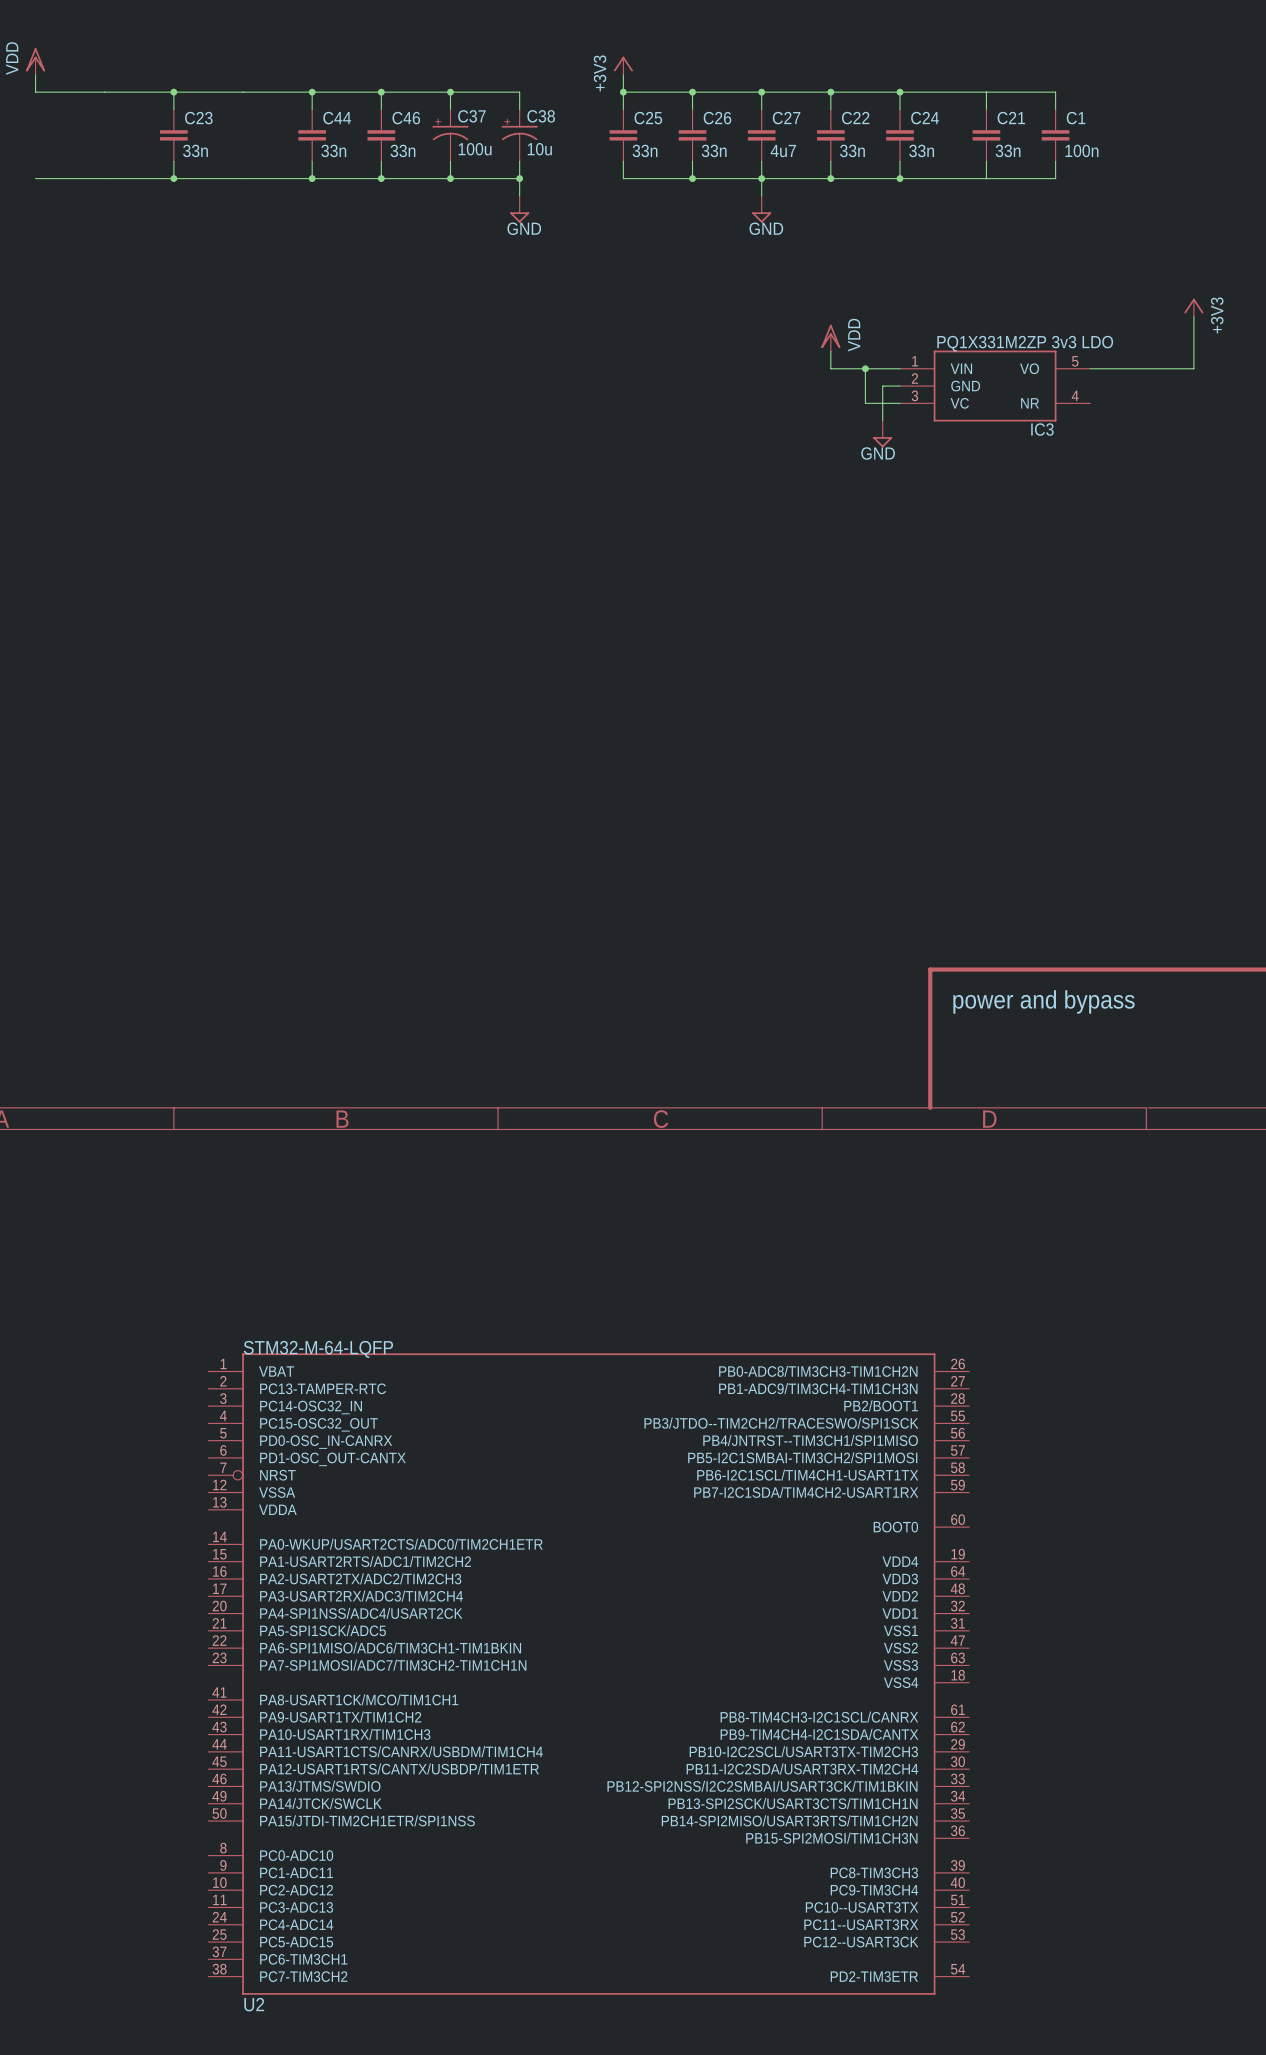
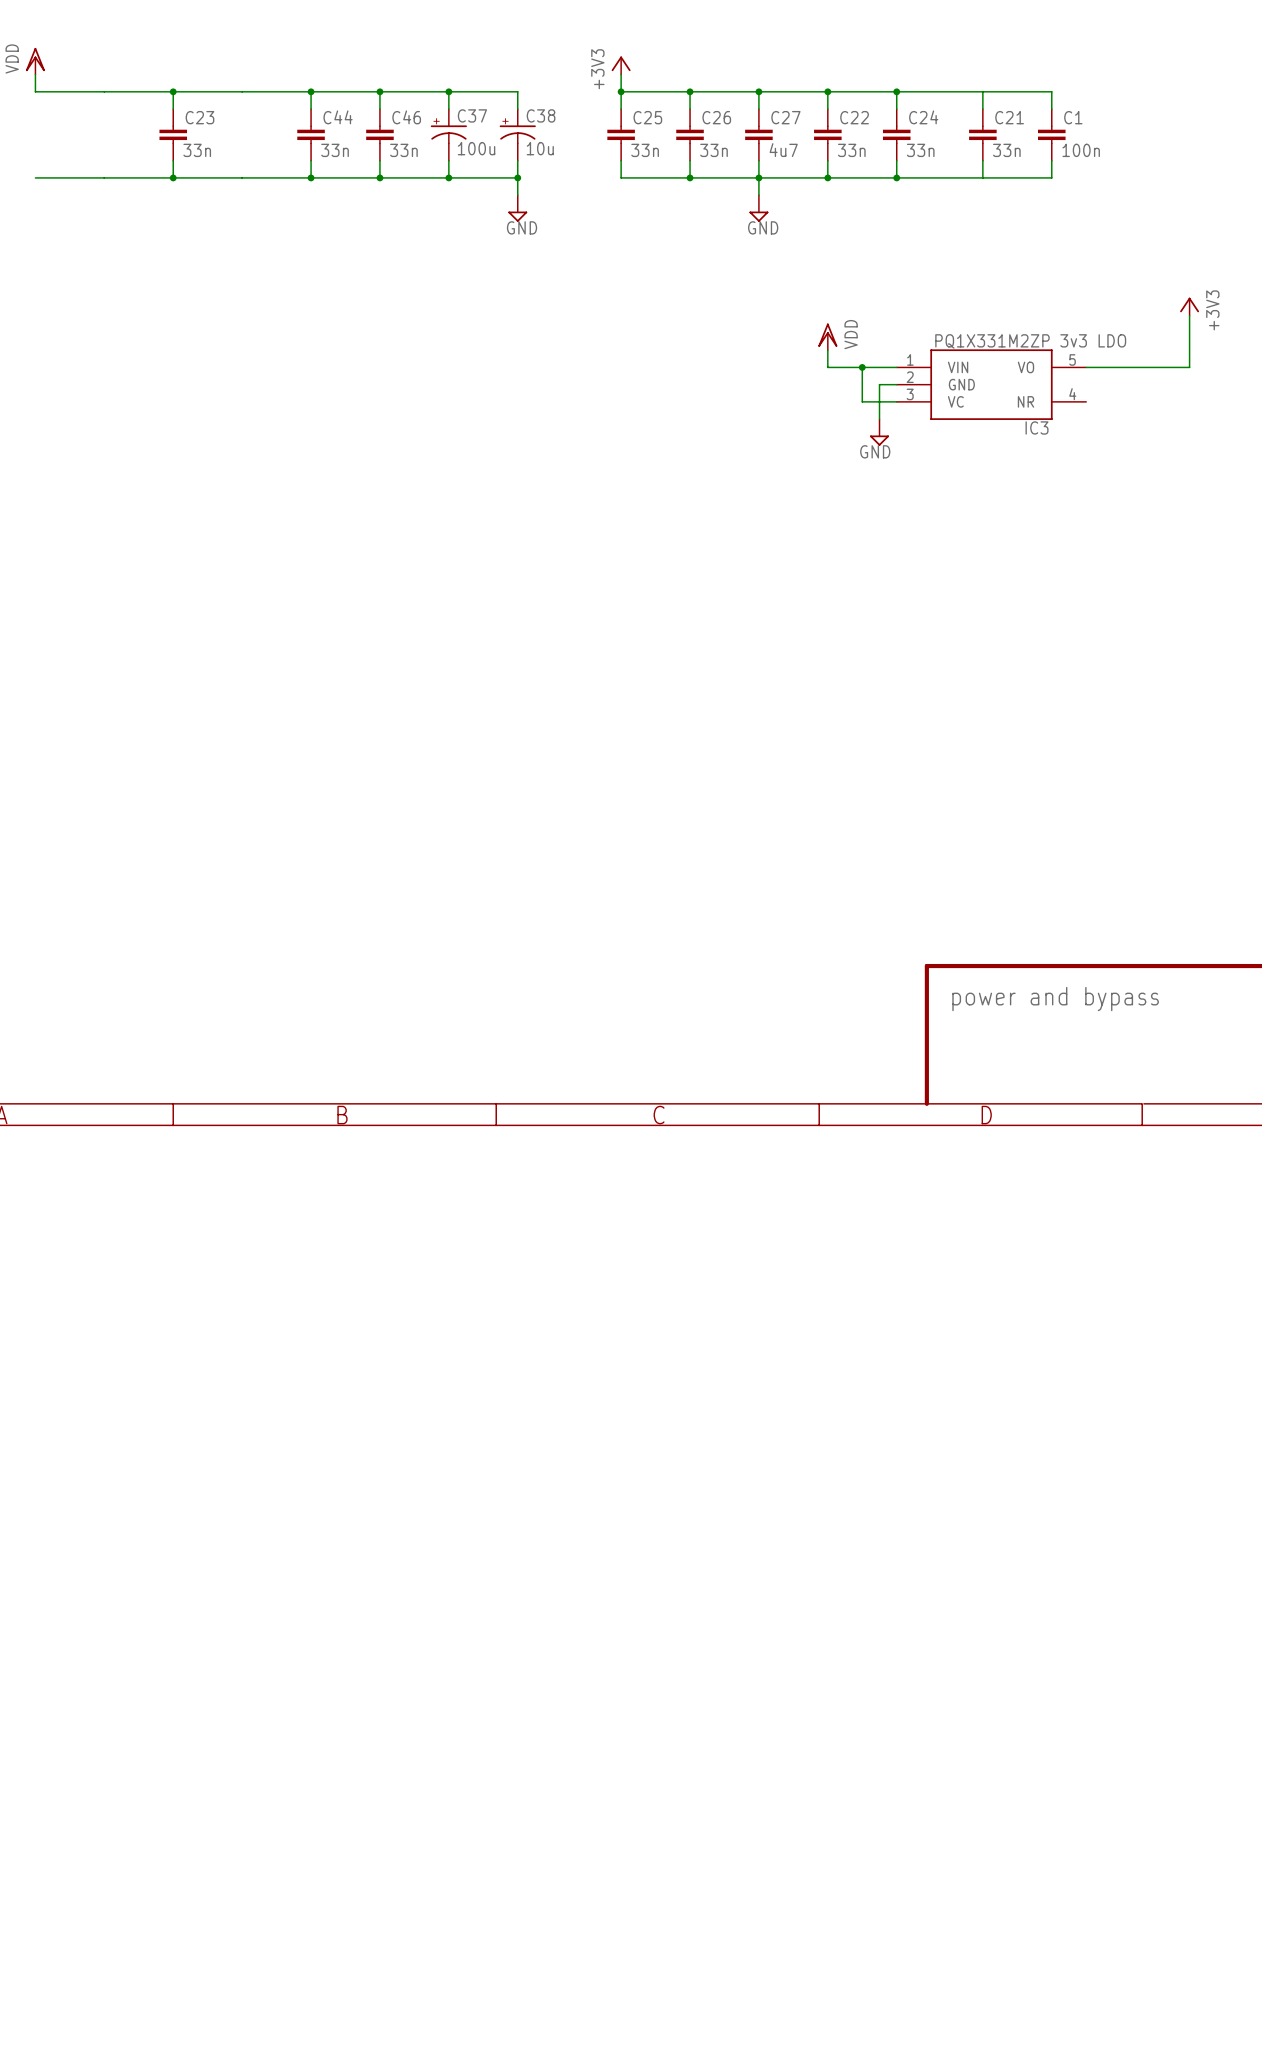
U2: STM32-M-64-LQFP (588, 1674) -> none

